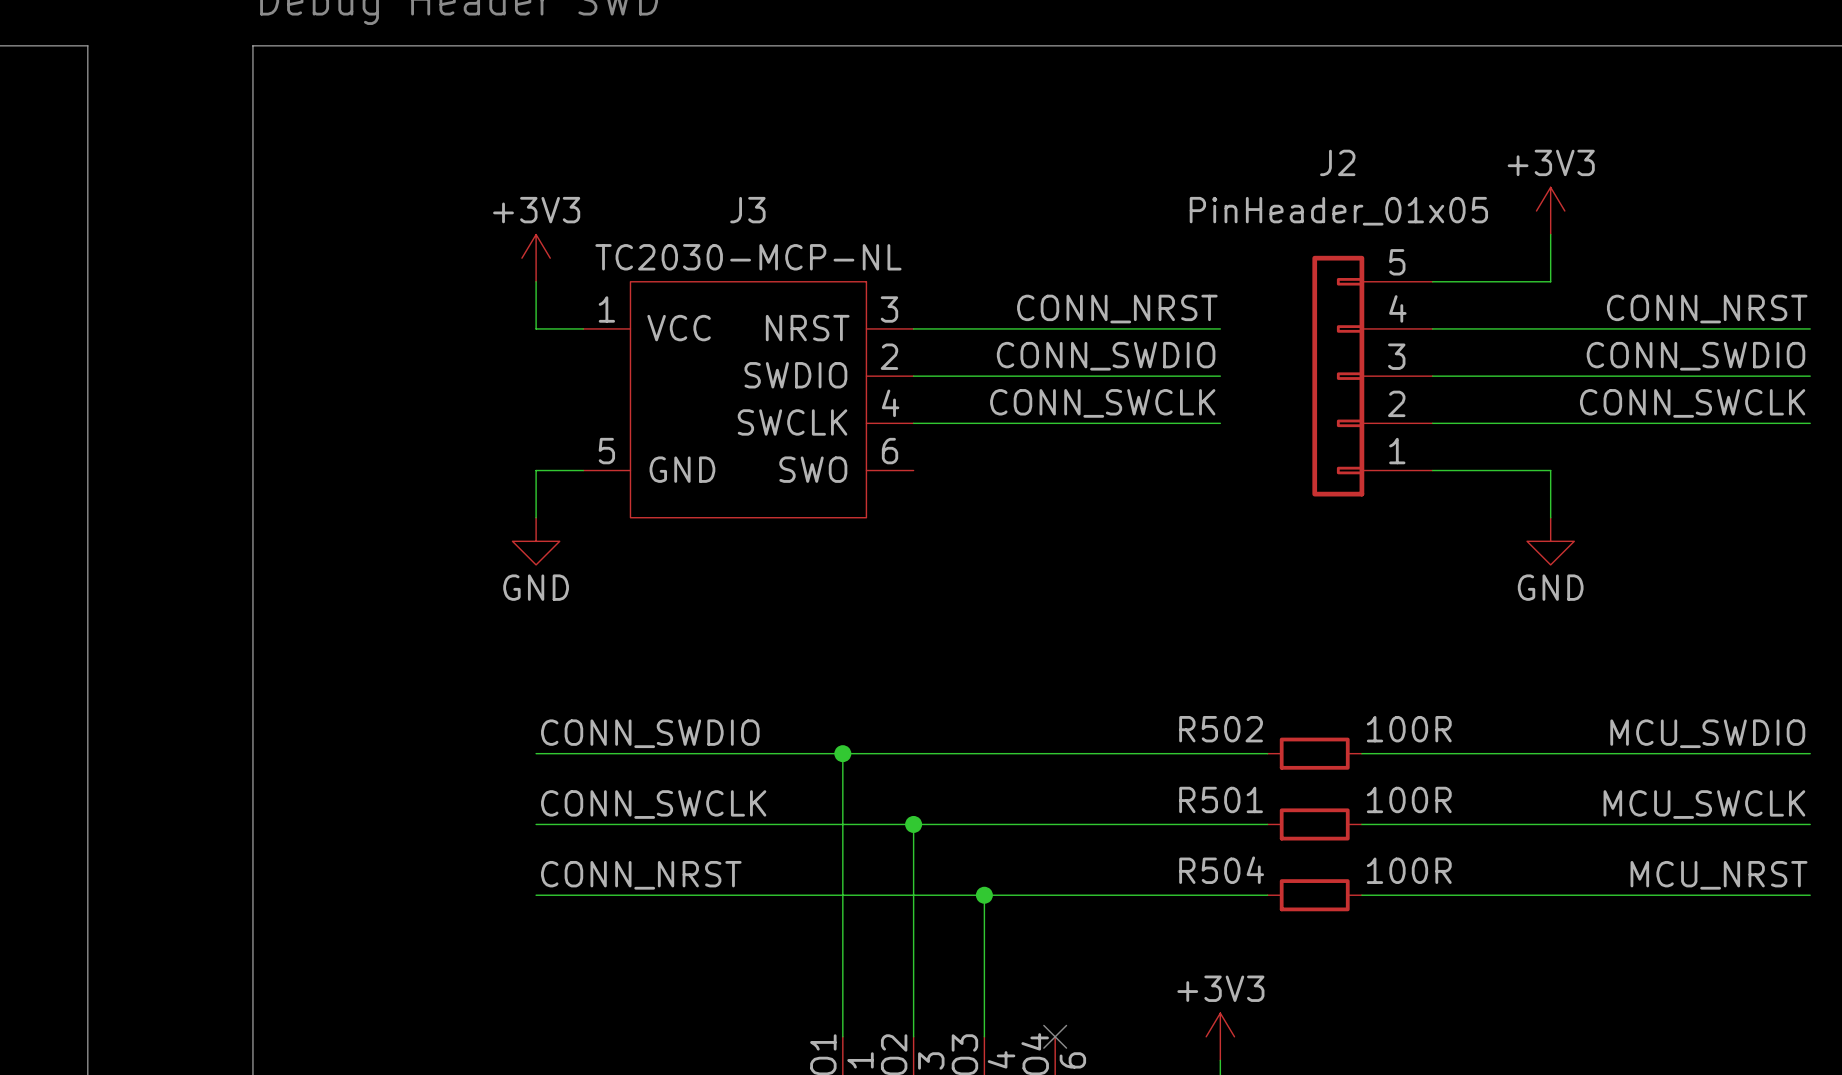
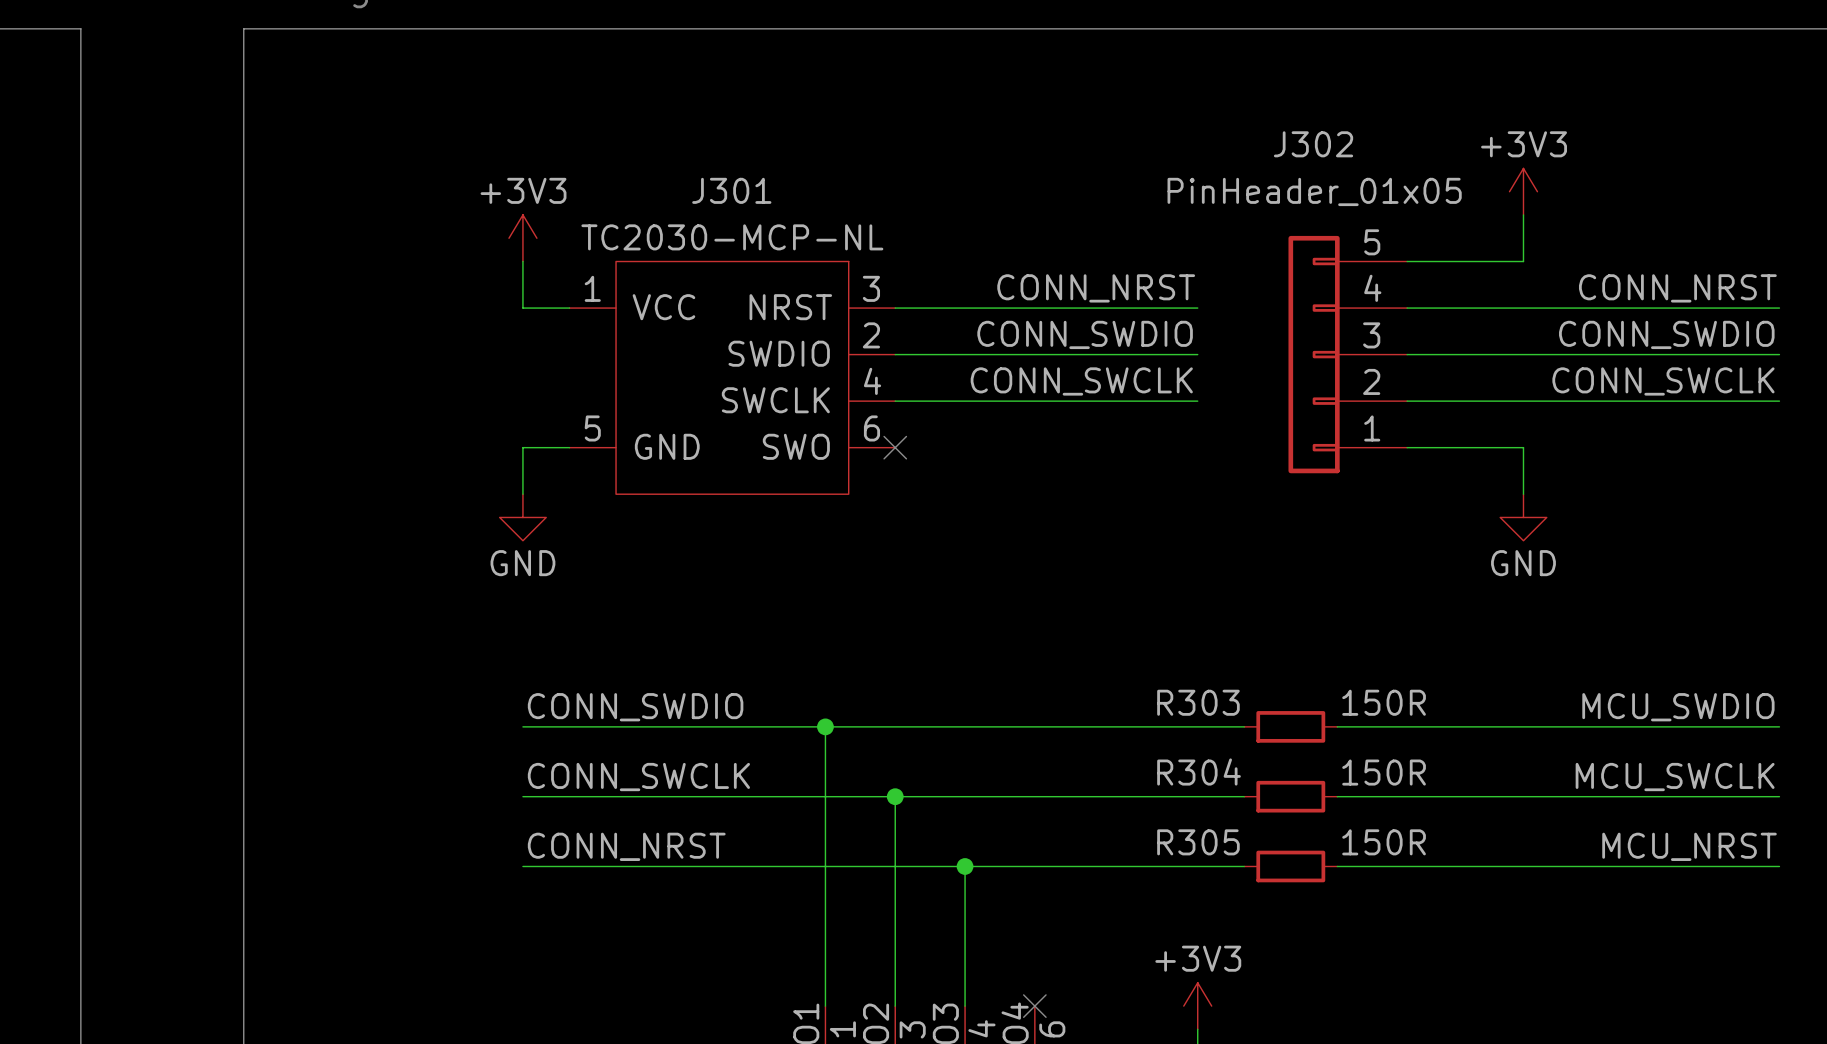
J2 name: J2 (1337, 162) -> J302 (1313, 144)
J3 name: J3 (747, 210) -> J301 (731, 190)
no-connect mark: none -> (895, 447)
R502 name: R502 (1221, 729) -> R303 (1198, 702)
R502 value: 100R (1409, 729) -> 150R (1384, 702)
R501 name: R501 (1221, 799) -> R304 (1199, 771)
R501 value: 100R (1409, 799) -> 150R (1384, 772)
R504 name: R504 (1221, 870) -> R305 (1198, 842)
R504 value: 100R (1409, 870) -> 150R (1384, 842)

